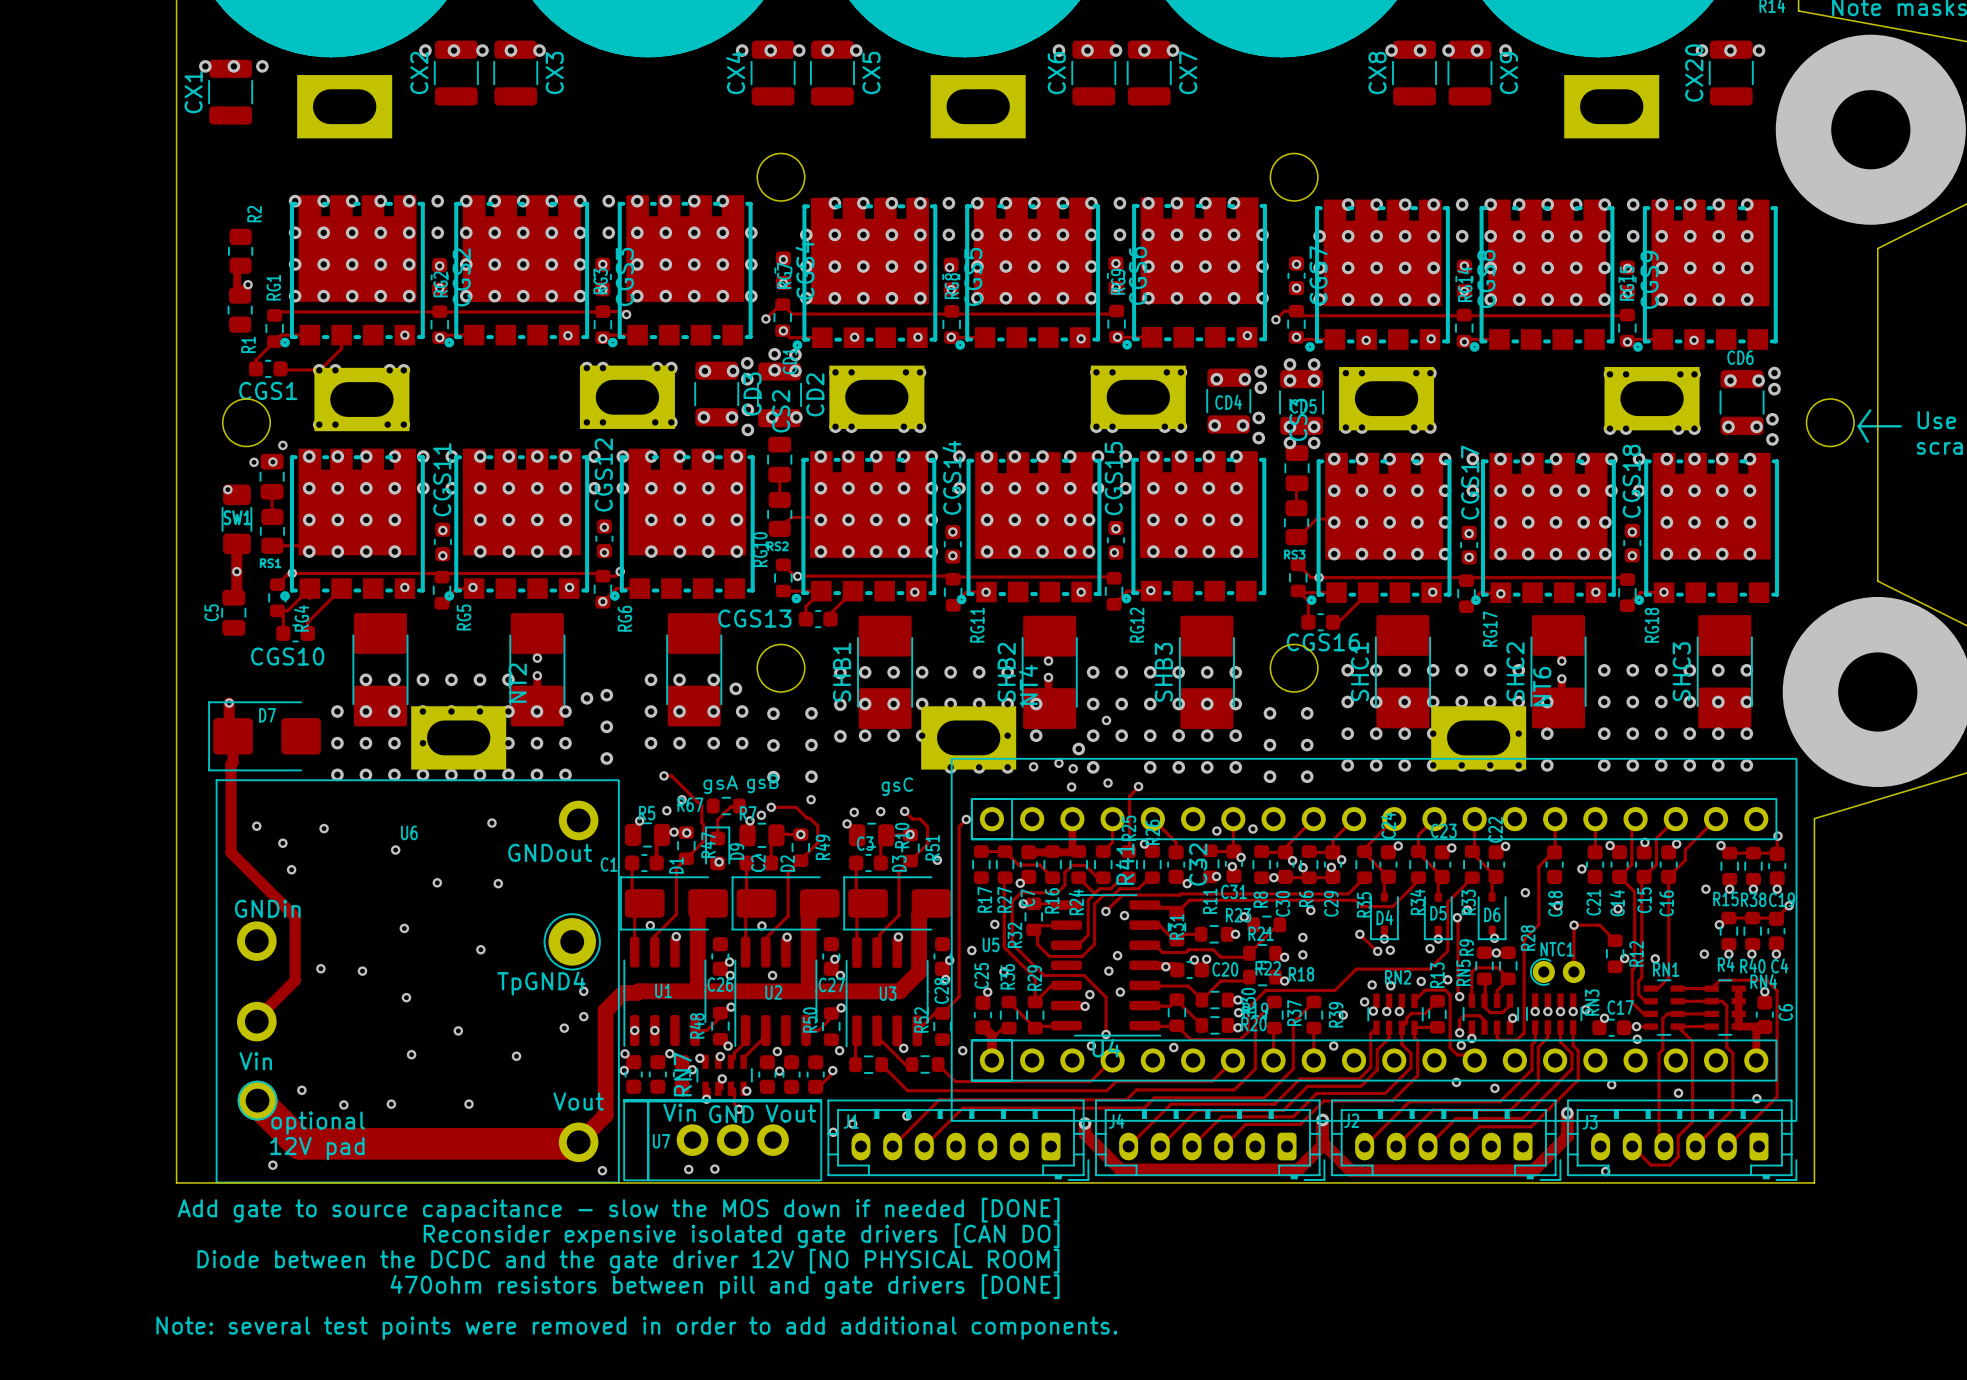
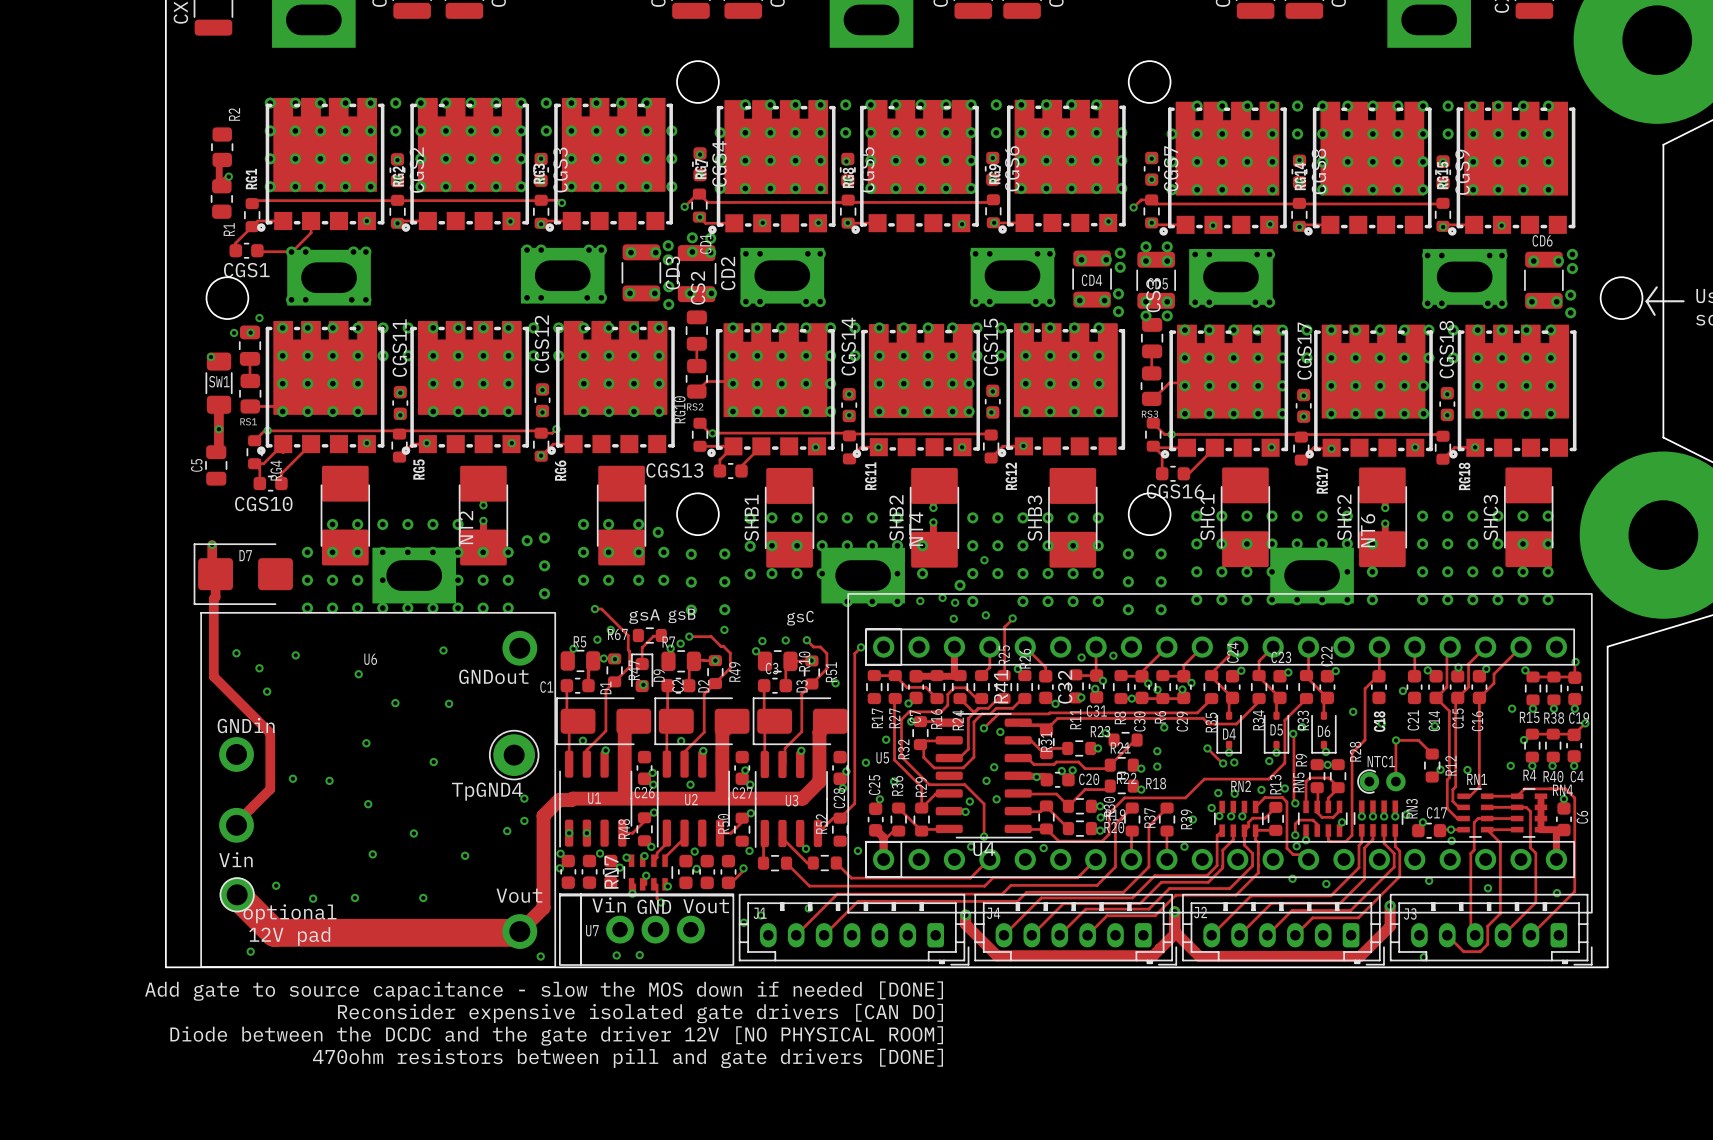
text: Note: several test points were removed in order to add additional components. (636, 1328) -> none

